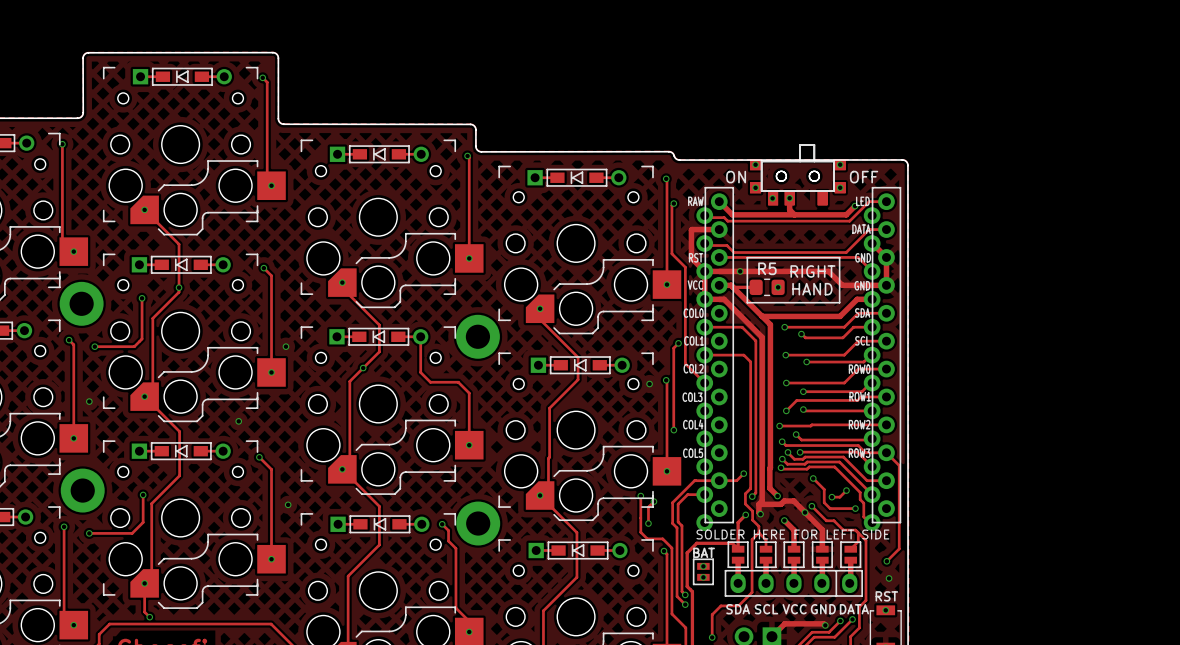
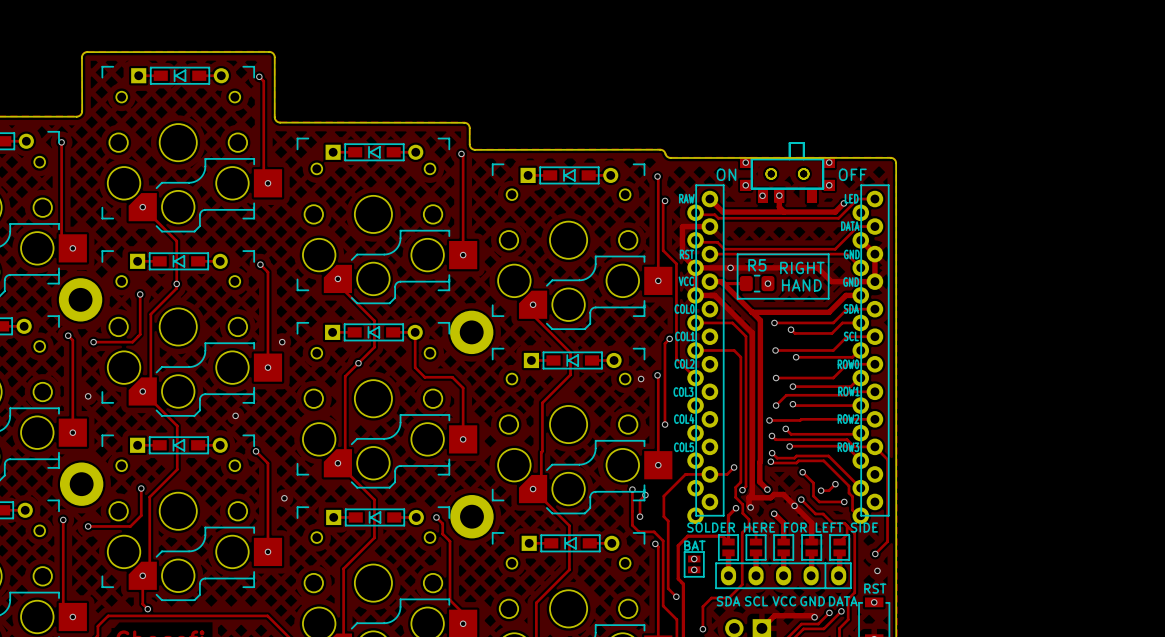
track: (787, 452) (794, 459) (802, 459) (805, 457) (843, 457) (867, 480) (886, 480) -> none
via: (787, 452) -> none
track: (704, 494) (687, 494) (678, 504) (678, 522) (681, 525) (681, 591) (685, 594) -> none
via: (685, 594) -> none

